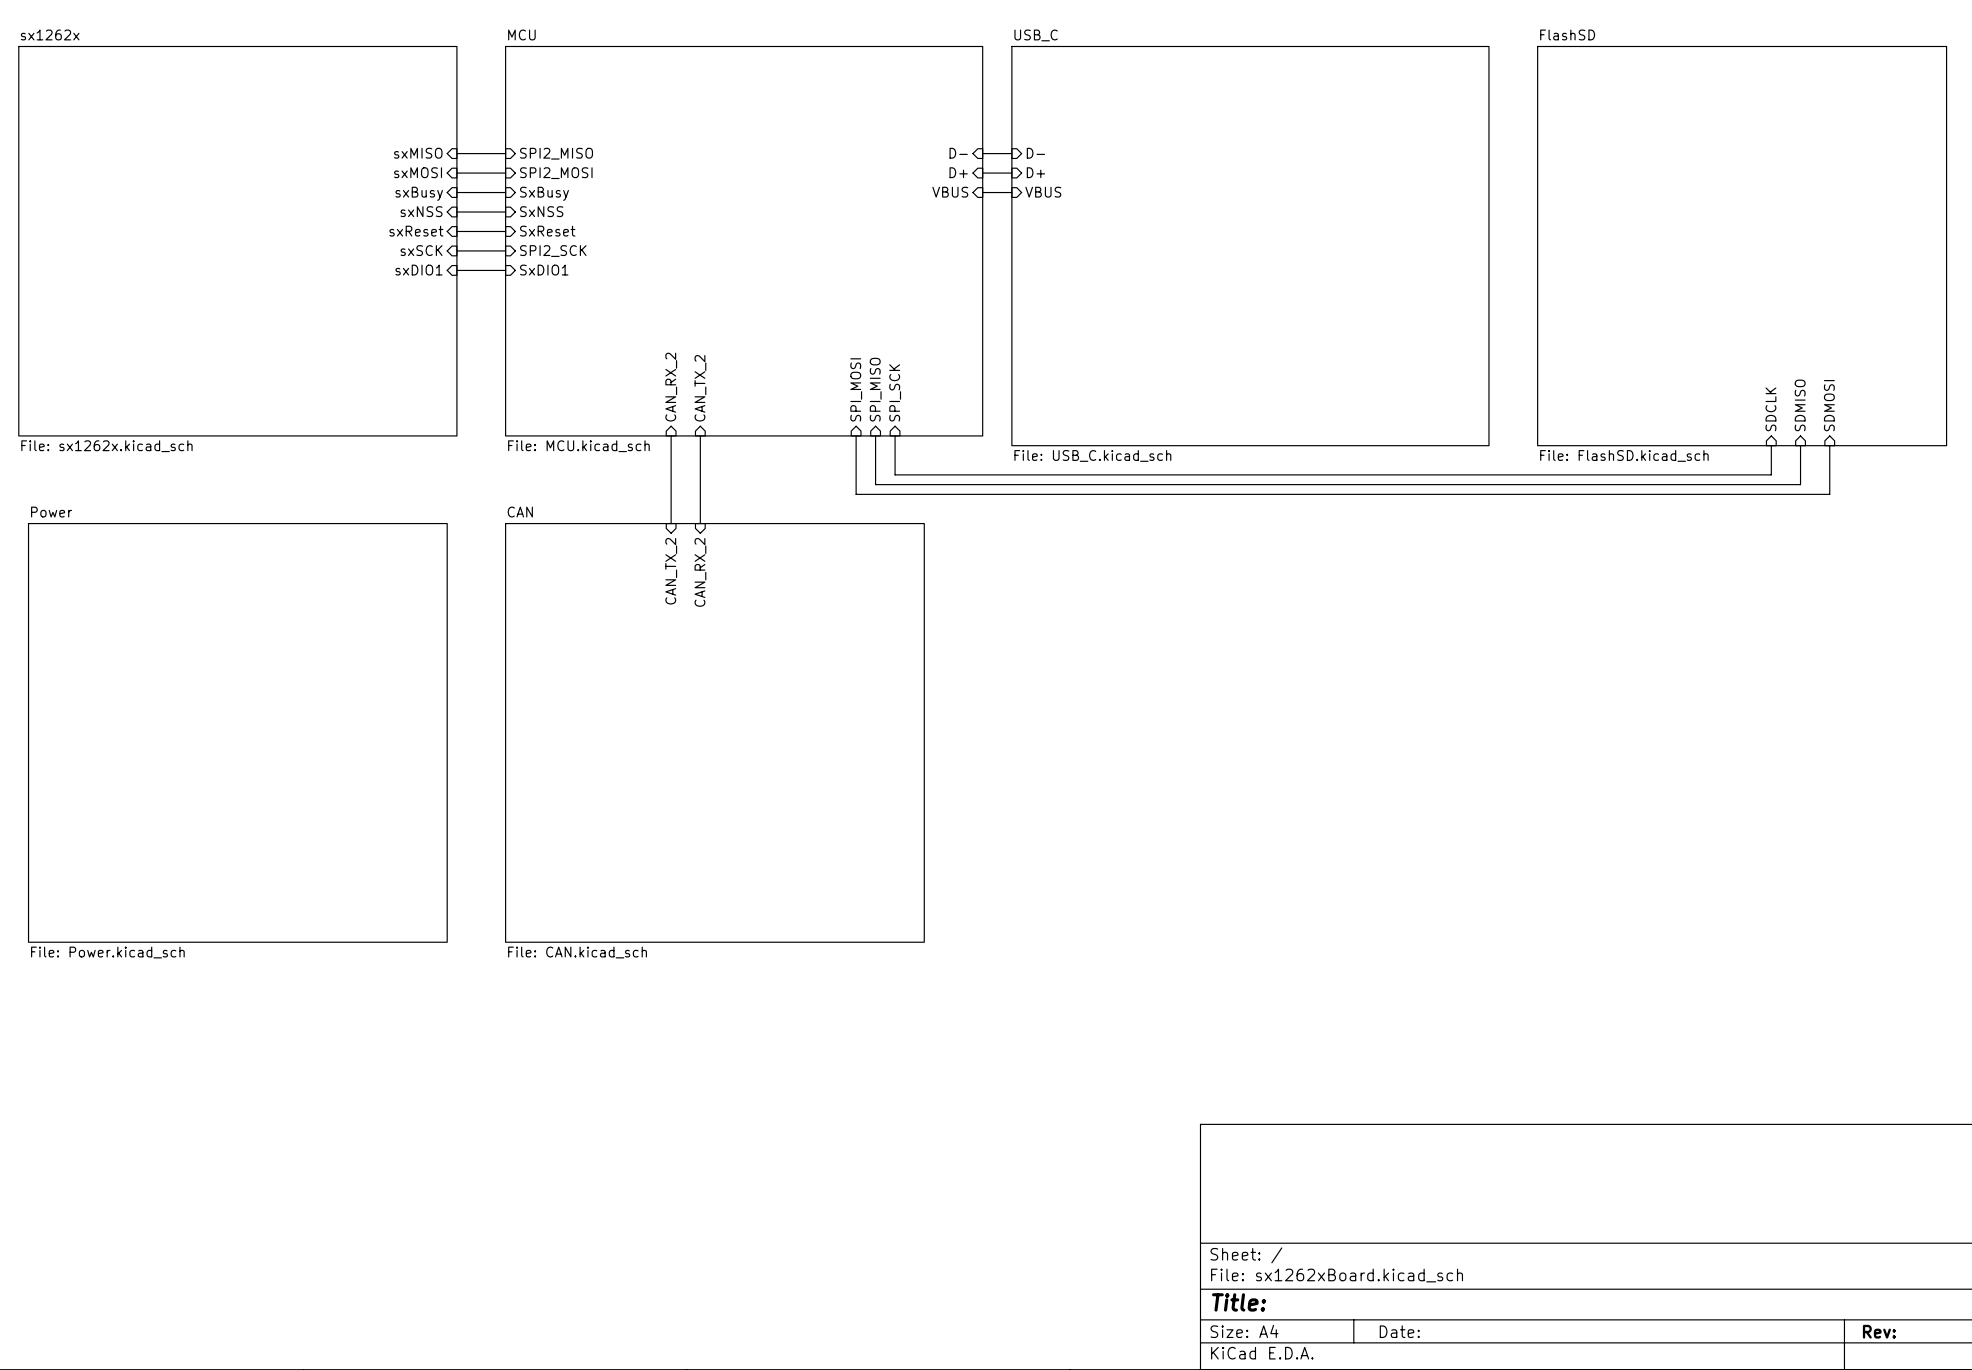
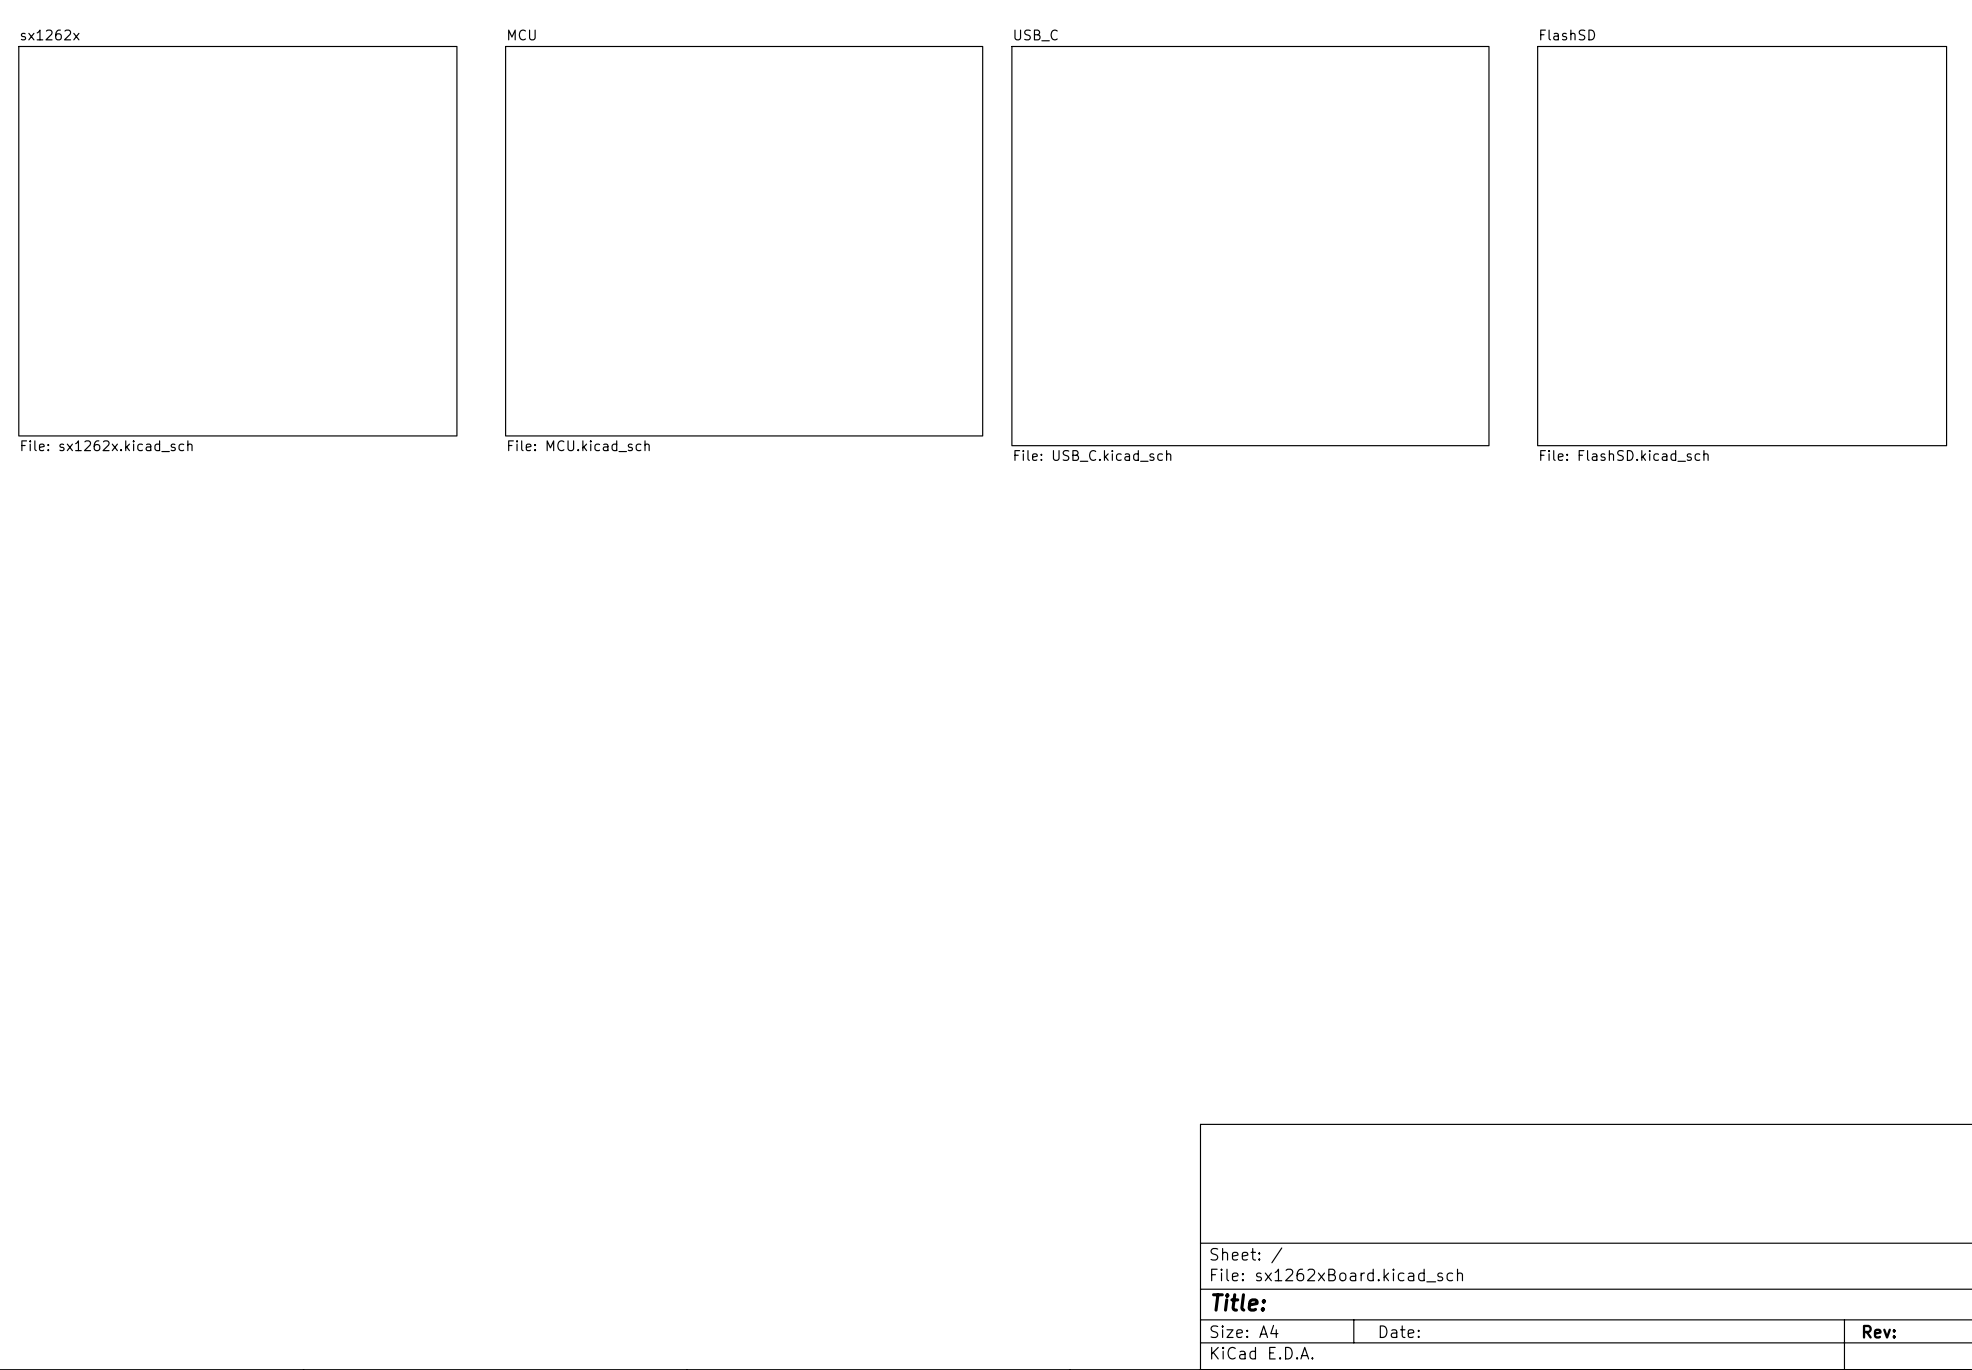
sheet pin: sxMISO (418, 153) -> none
wire: (456, 153) (505, 153) -> none
sheet pin: SPI2_MISO (556, 153) -> none
sheet pin: D- (958, 153) -> none
wire: (982, 153) (1011, 153) -> none
sheet pin: D- (1035, 153) -> none
sheet pin: sxMOSI (418, 172) -> none
sheet pin: D+ (958, 172) -> none
sheet pin: D+ (1035, 172) -> none
wire: (456, 173) (505, 173) -> none
sheet pin: SPI2_MOSI (556, 173) -> none
wire: (982, 173) (1011, 173) -> none
wire: (456, 192) (505, 192) -> none
sheet pin: VBUS (950, 192) -> none
wire: (982, 192) (1011, 192) -> none
sheet pin: VBUS (1043, 192) -> none
sheet pin: sxBusy (419, 193) -> none
sheet pin: SxBusy (544, 193) -> none
sheet pin: sxNSS (421, 211) -> none
sheet pin: SxNSS (541, 211) -> none
wire: (456, 212) (505, 212) -> none
sheet pin: sxReset (416, 231) -> none
wire: (456, 231) (505, 231) -> none
sheet pin: SxReset (547, 231) -> none
sheet pin: sxSCK (421, 250) -> none
wire: (456, 250) (505, 250) -> none
sheet pin: SPI2_SCK (553, 251) -> none
sheet pin: sxDIO1 (418, 270) -> none
wire: (456, 270) (505, 270) -> none
sheet pin: SxDIO1 (544, 270) -> none
sheet pin: CAN_RX_2 (671, 387) -> none
sheet pin: CAN_TX_2 (700, 388) -> none
sheet pin: SPI_MOSI (856, 389) -> none
sheet pin: SPI_MISO (875, 389) -> none
sheet pin: SPI_SCK (895, 392) -> none
sheet pin: SDMISO (1800, 405) -> none
sheet pin: SDMOSI (1829, 405) -> none
sheet pin: SDCLK (1770, 409) -> none
wire: (671, 435) (671, 523) -> none
wire: (700, 435) (700, 523) -> none
wire: (856, 435) (856, 494) (1829, 494) (1829, 445) -> none
wire: (875, 435) (875, 484) (1800, 484) (1800, 445) -> none
wire: (895, 435) (895, 474) (1771, 474) (1771, 445) -> none
sheet pin: CAN_TX_2 (671, 571) -> none
sheet pin: CAN_RX_2 (700, 572) -> none
sheet Power: File: Power.kicad_sch (237, 732) -> none
sheet CAN: File: CAN.kicad_sch (714, 732) -> none

